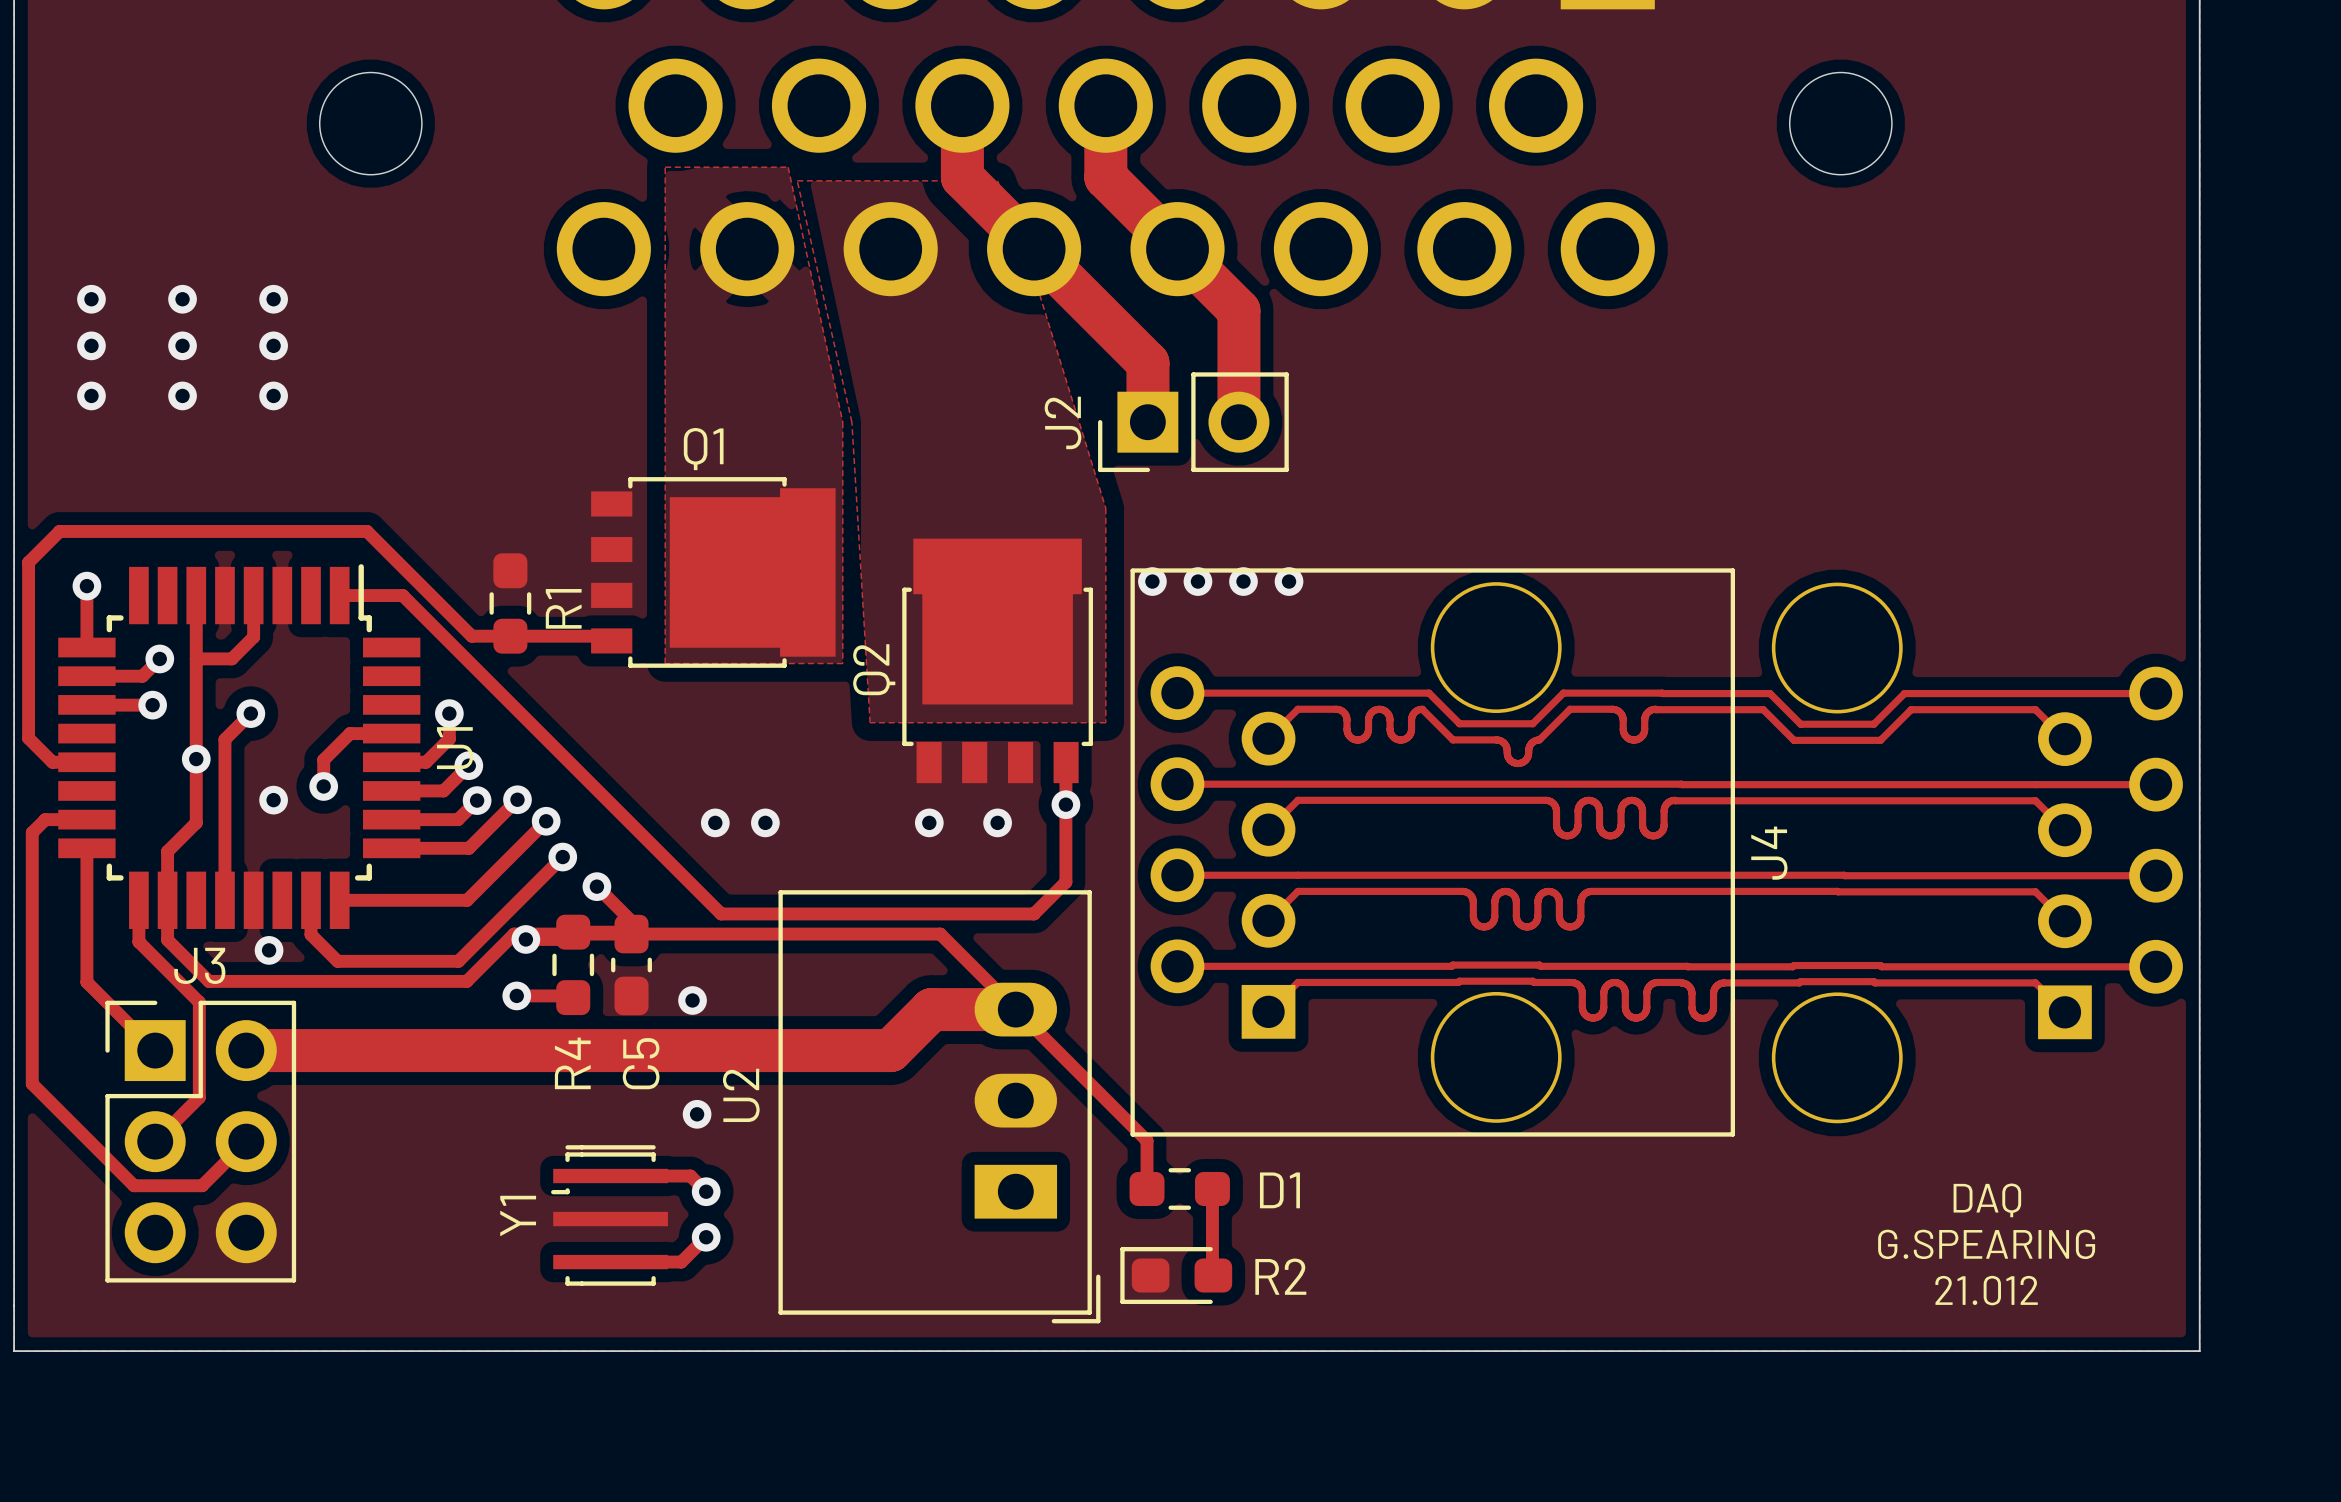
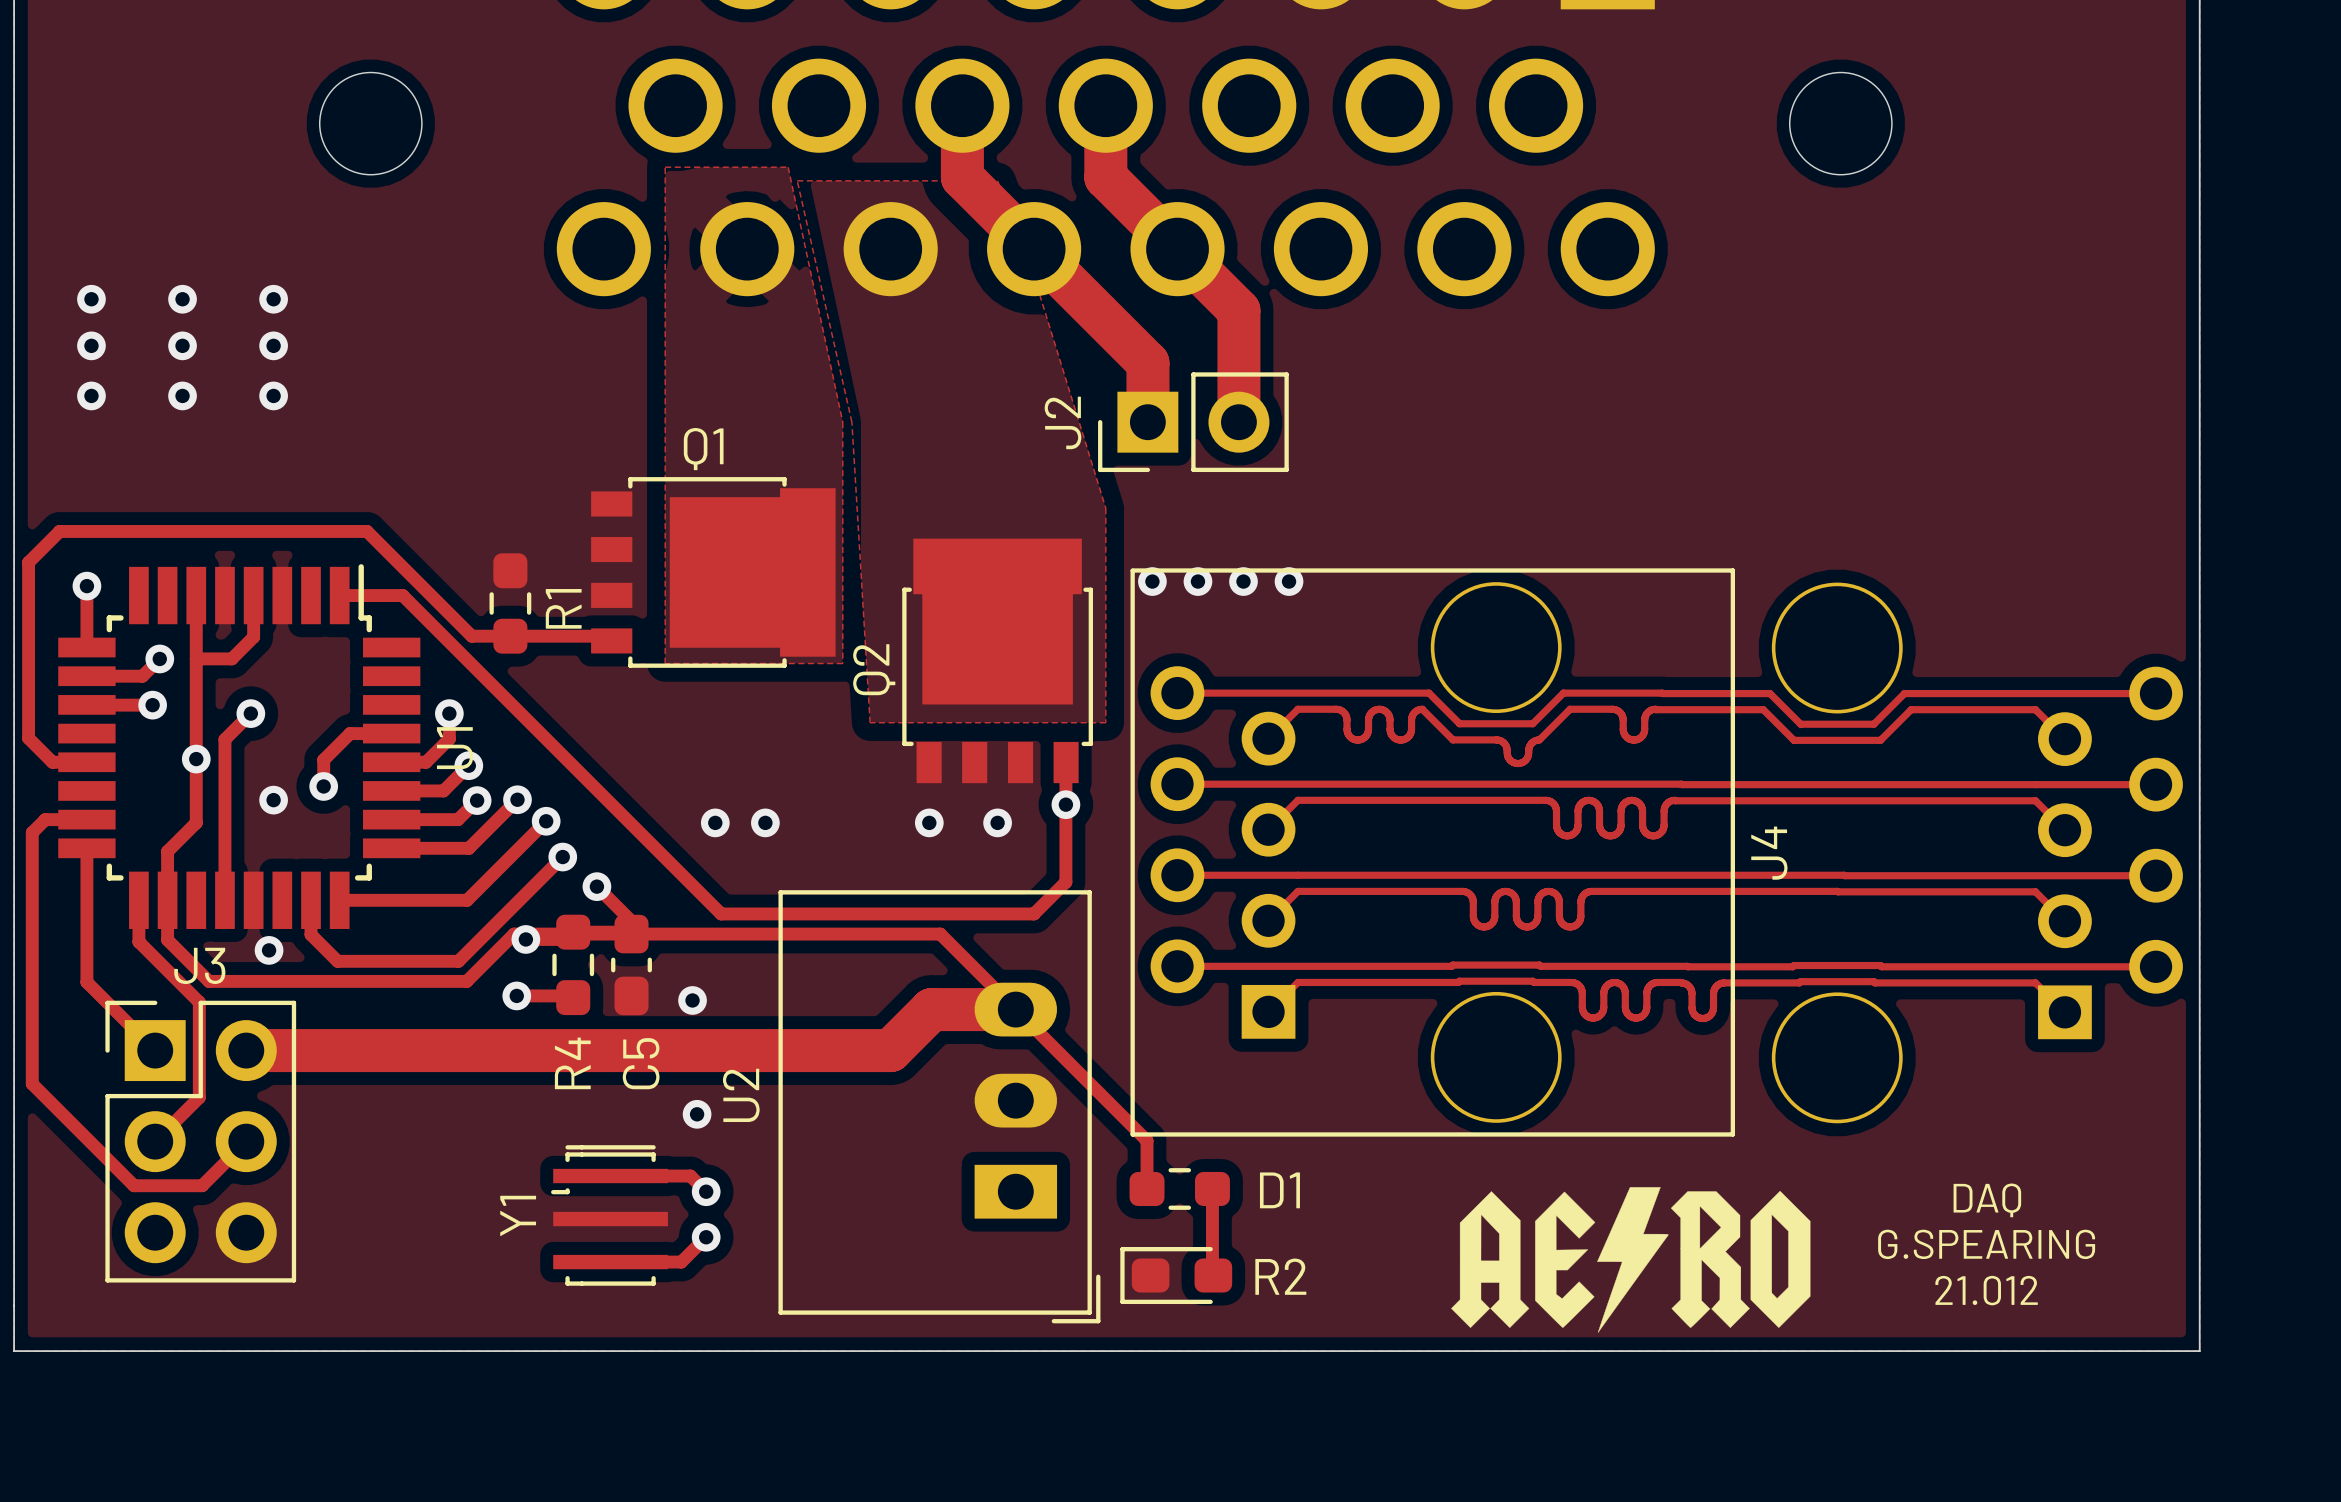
drawing: none -> [1451, 1187, 1811, 1333]

